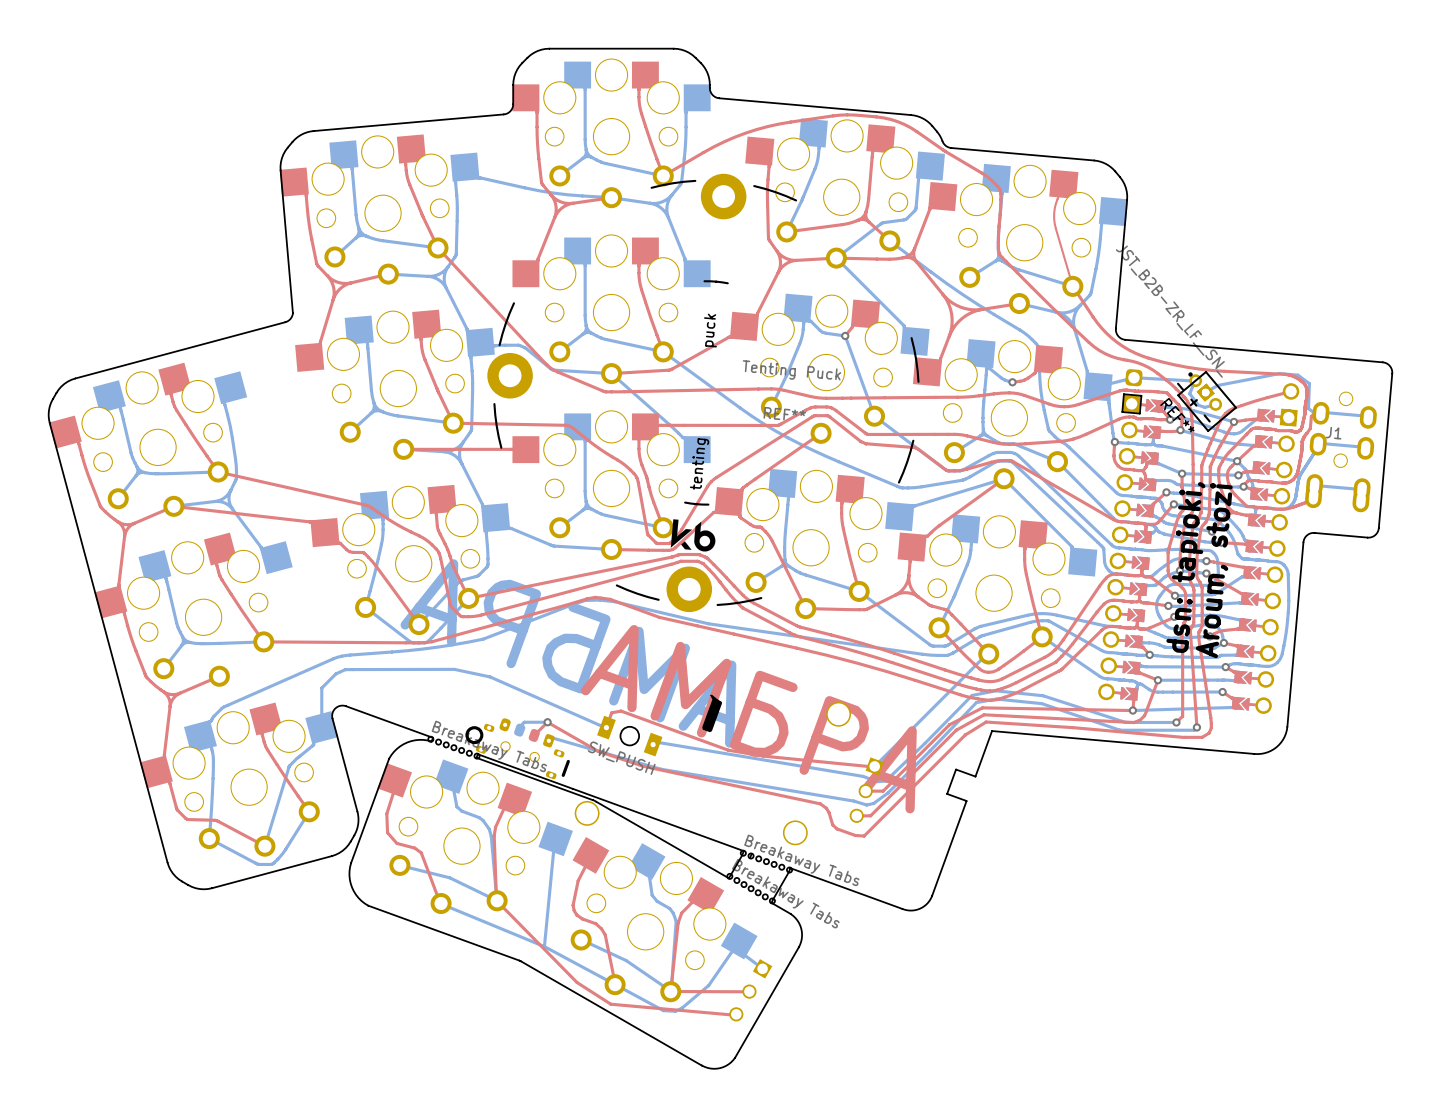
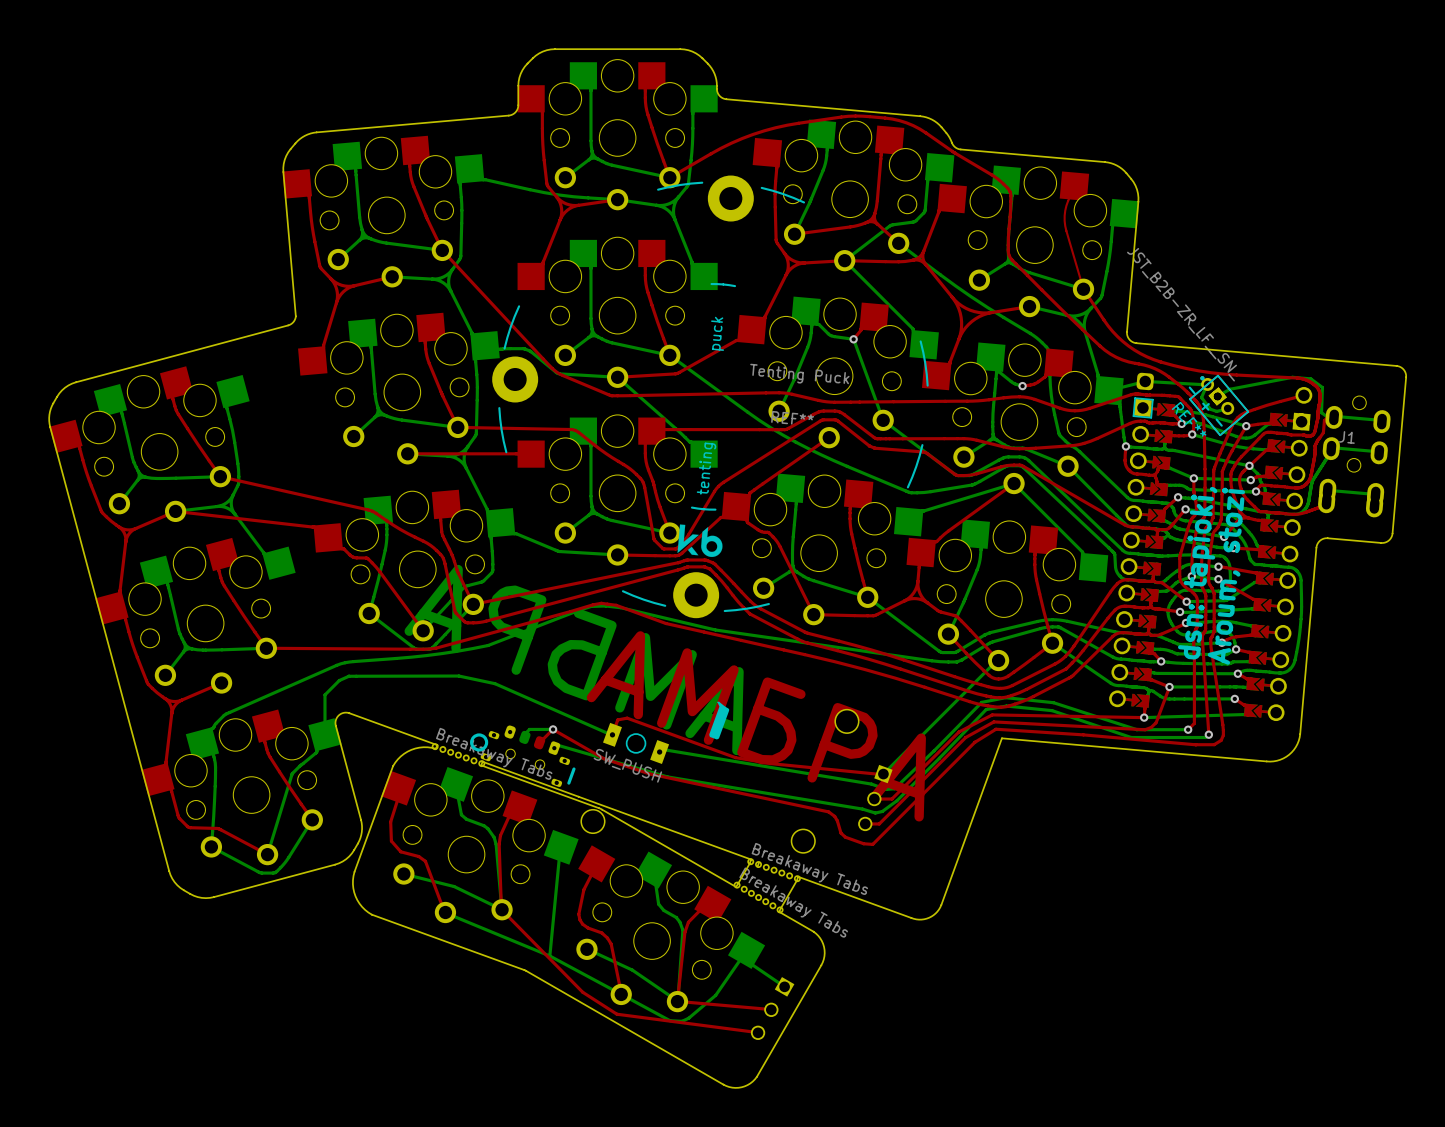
board edge: (975, 776) (956, 769) (947, 793) (966, 800) (932, 896) -> (985, 784) (941, 904)
board edge: (790, 913) (797, 920) (801, 929) (800, 944) (735, 1057) (728, 1064) (720, 1068) (710, 1068) (701, 1065) -> (798, 923) (813, 931) (820, 938) (824, 950) (823, 959) (756, 1076) (747, 1085) (735, 1087) (726, 1085) (708, 1076)
bottom track: (744, 954) (762, 968) -> (751, 964) (784, 986)
part position: (750, 990) -> (772, 1008)
top track: (670, 991) (749, 991) -> (677, 1001) (770, 1009)
top track: (610, 1004) (735, 1015) -> (616, 1014) (758, 1032)

